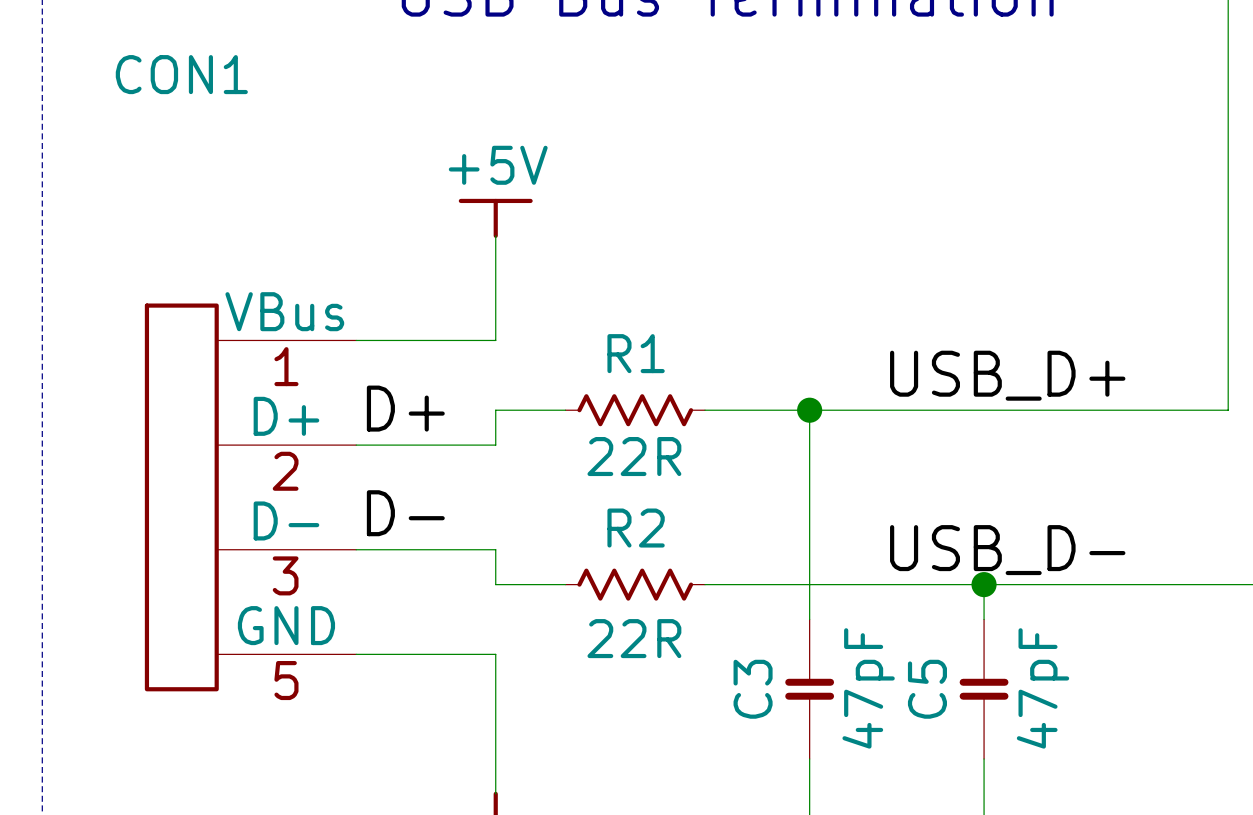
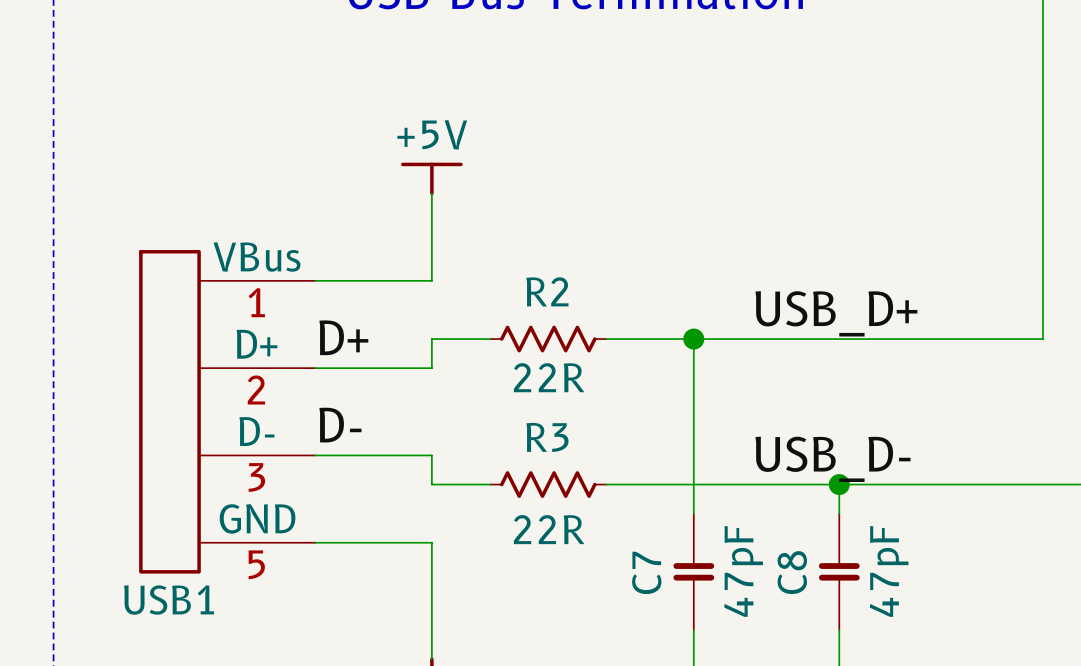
CON1 name: CON1 (181, 74) -> USB1 (169, 600)
R1 name: R1 (636, 353) -> R2 (547, 291)
R2 name: R2 (636, 528) -> R3 (547, 437)
C3 name: C3 (753, 689) -> C7 (646, 572)
C5 name: C5 (927, 689) -> C8 (792, 572)

